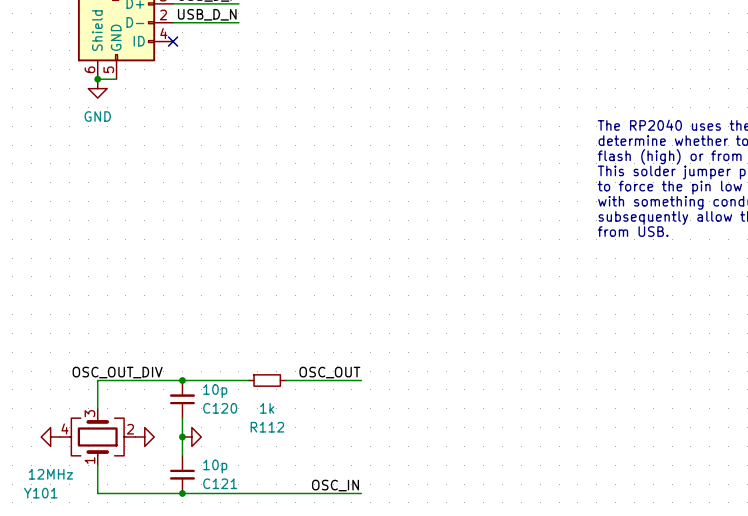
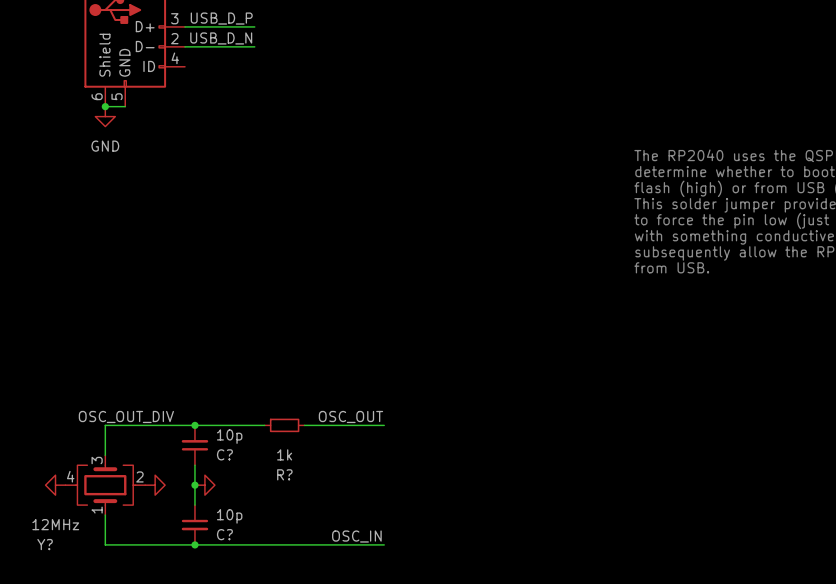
no-connect mark: (173, 41) -> none
C120 name: C120 (220, 408) -> C? (224, 454)
R112 name: R112 (267, 427) -> R? (284, 474)
C121 name: C121 (220, 483) -> C? (224, 534)
Y101 name: Y101 (40, 493) -> Y? (45, 544)

